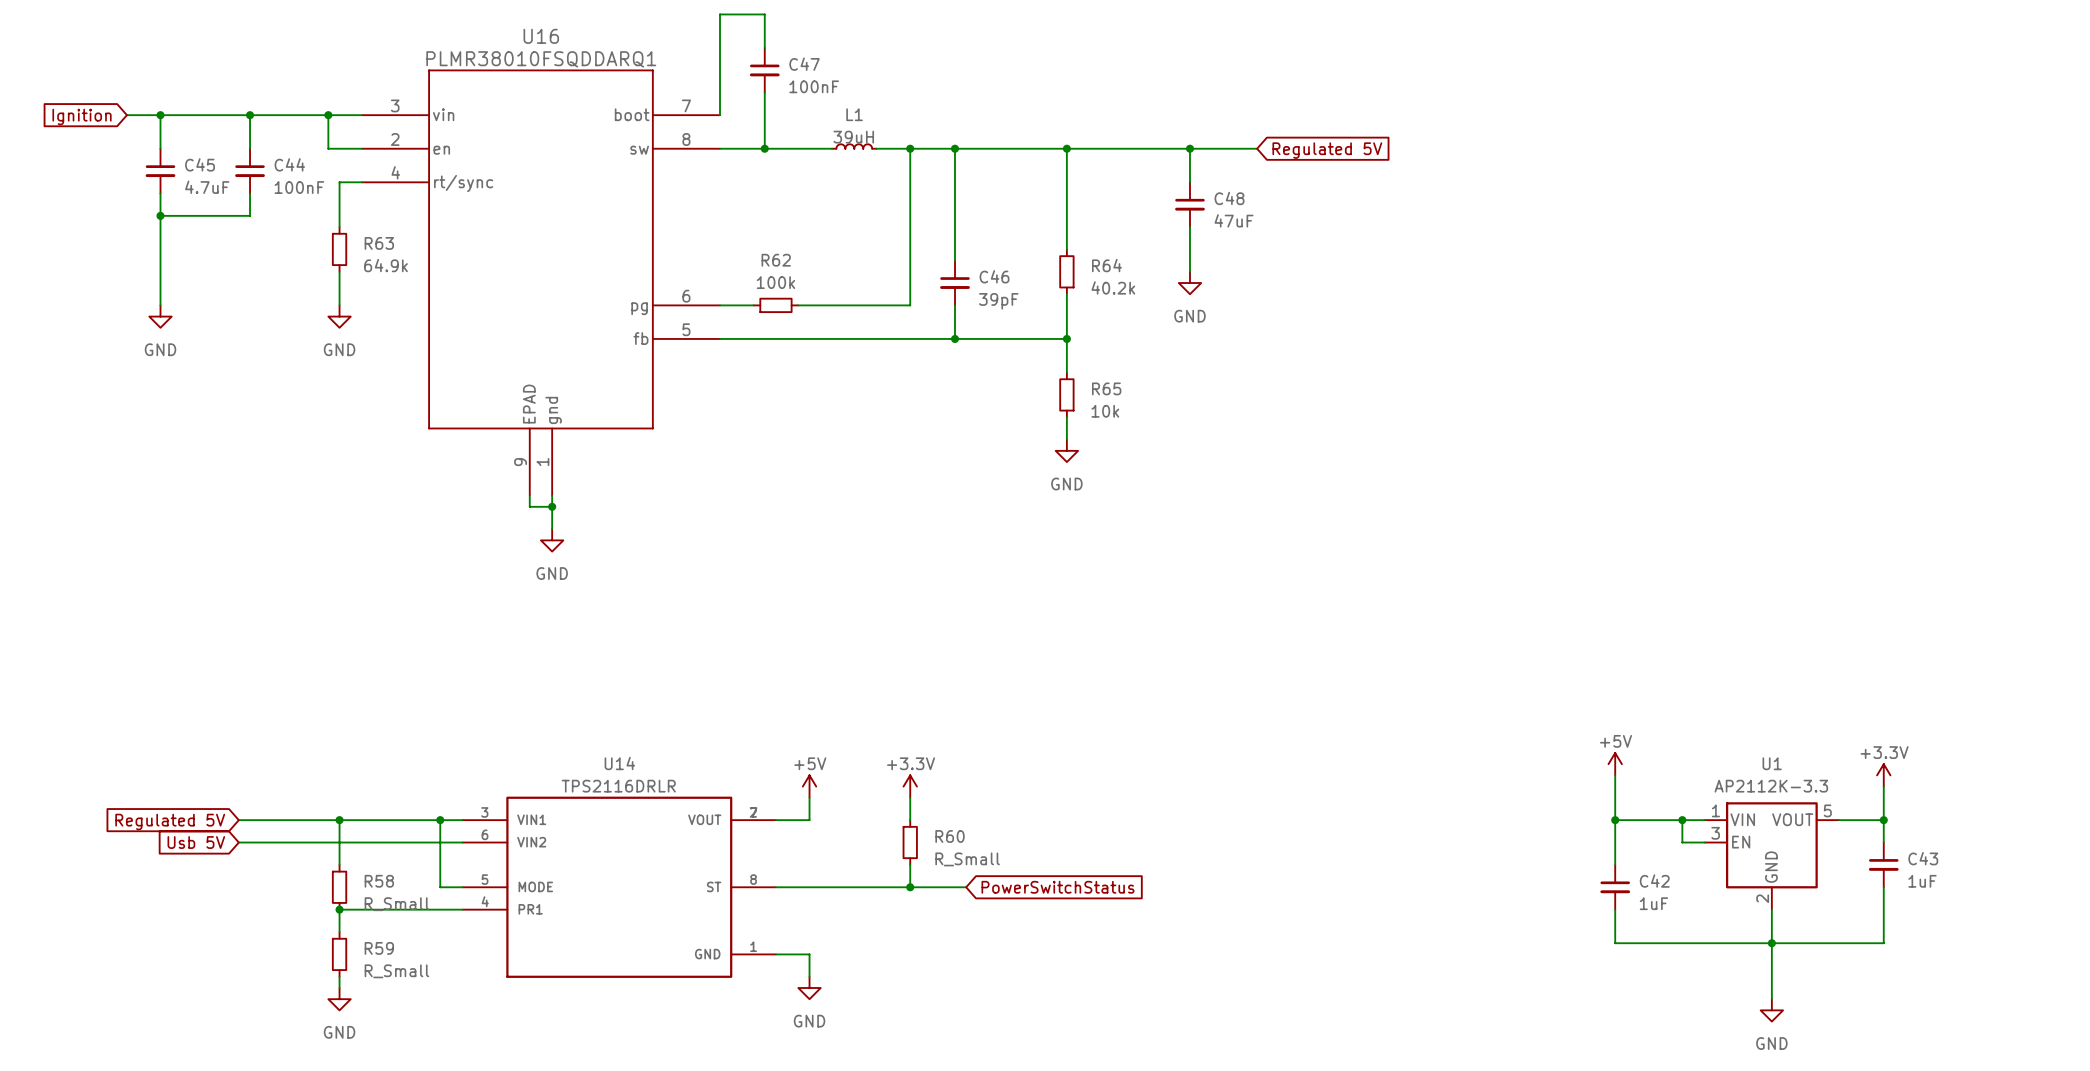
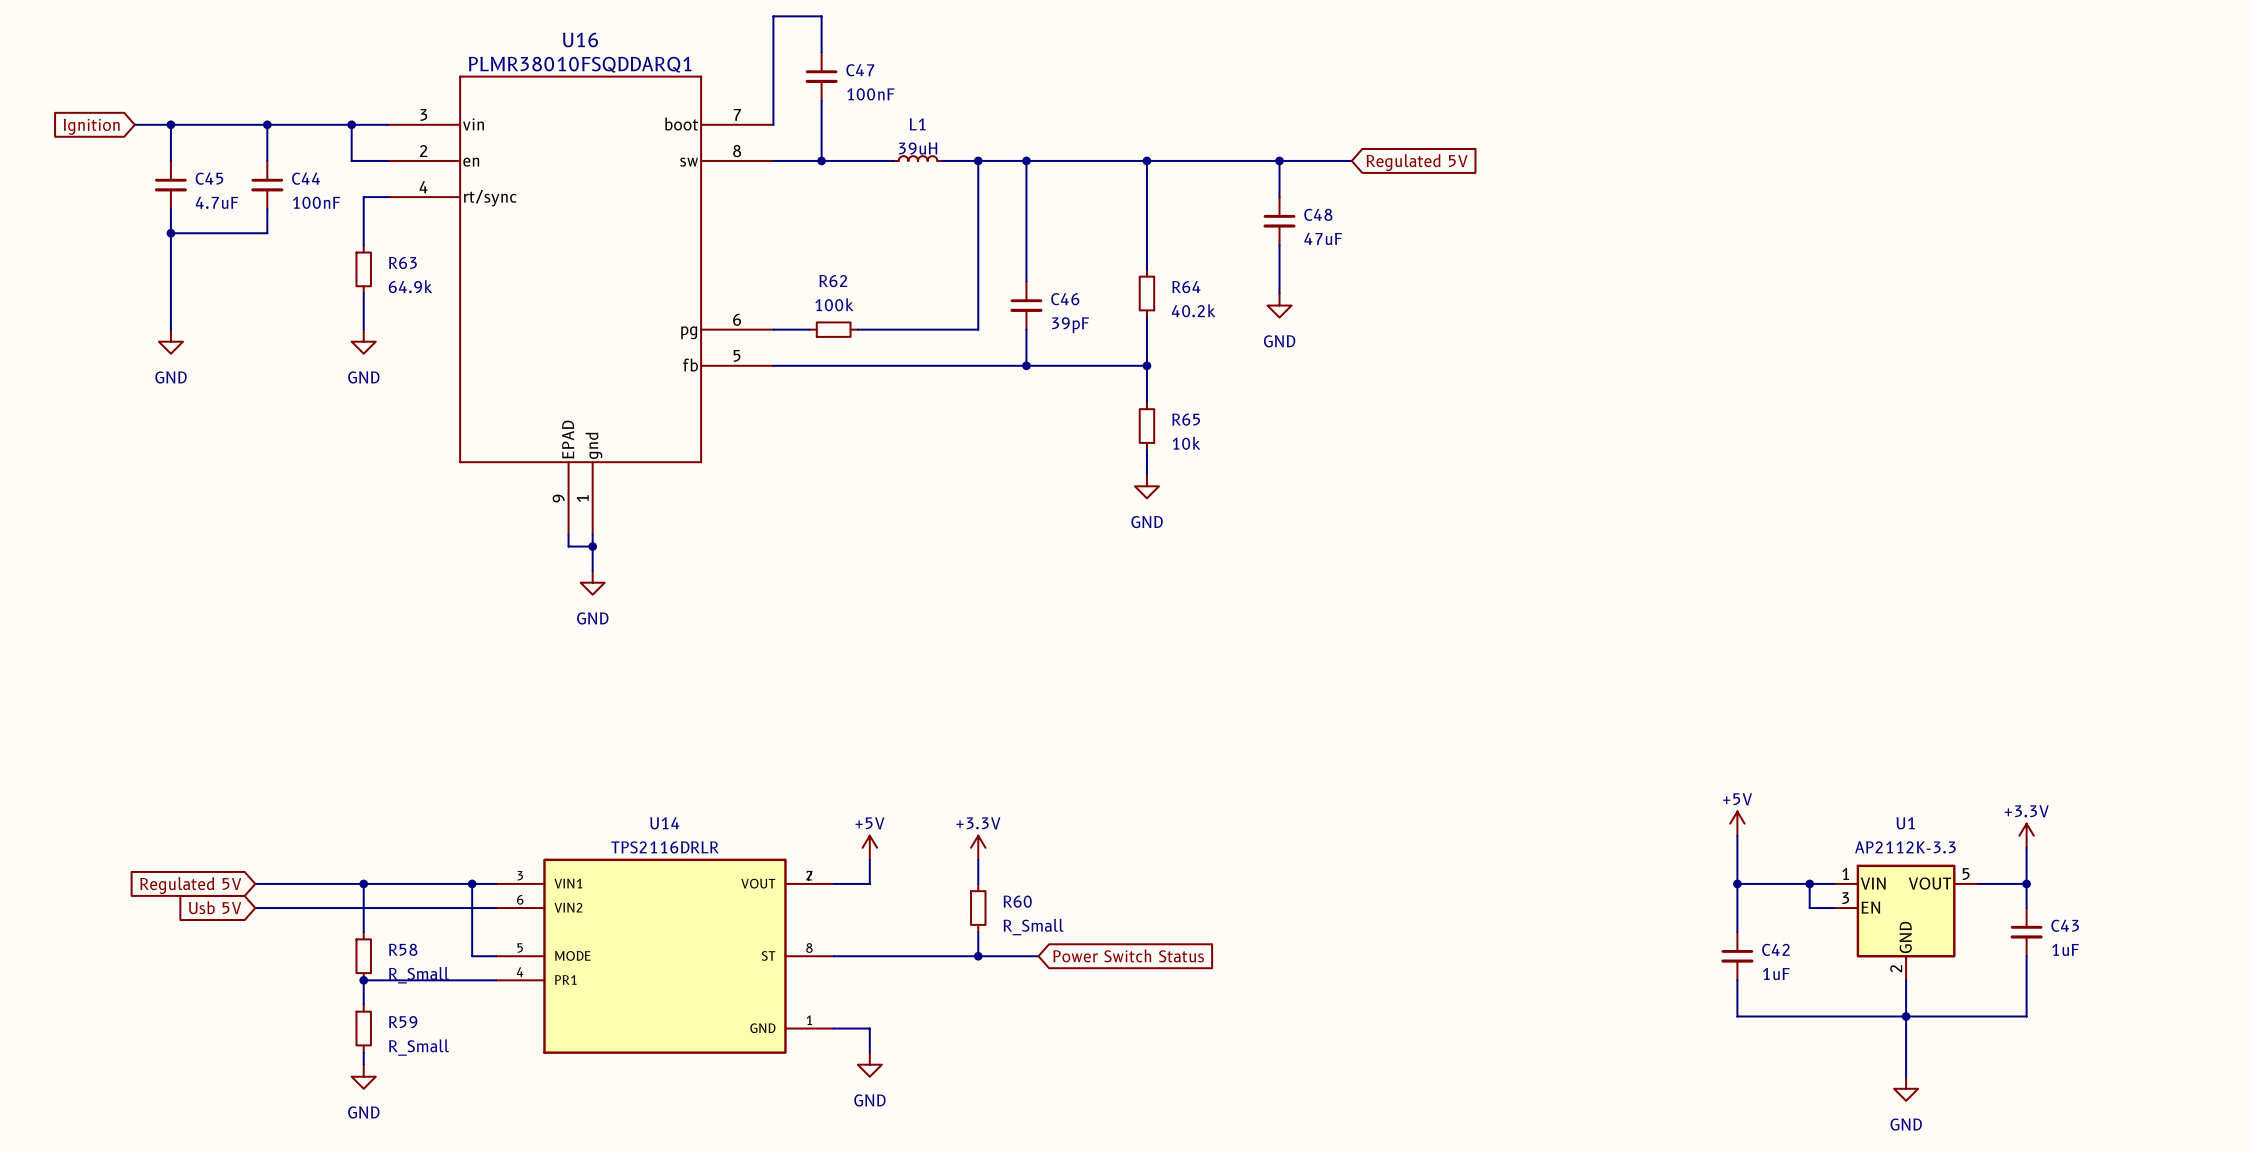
global label: PowerSwitchStatus (1057, 887) -> Power Switch Status (1128, 955)

